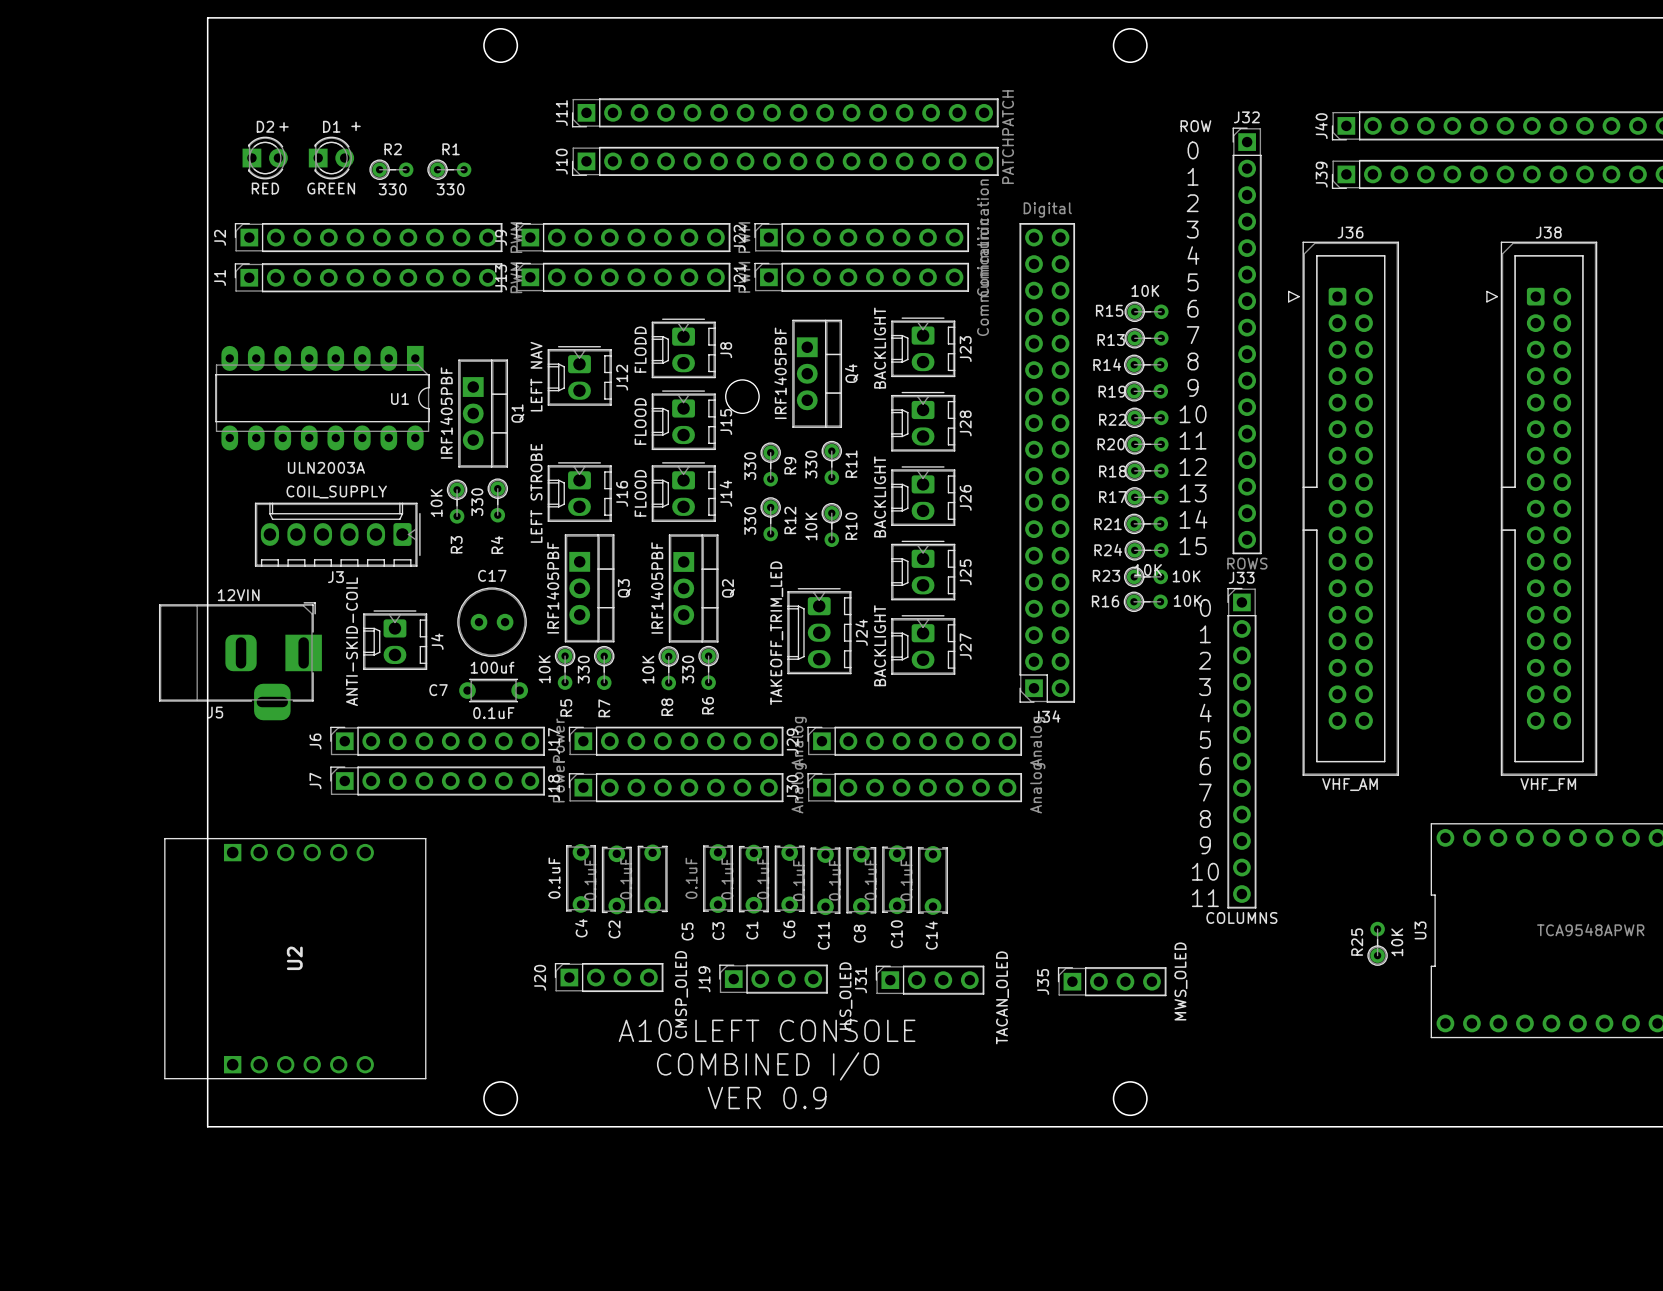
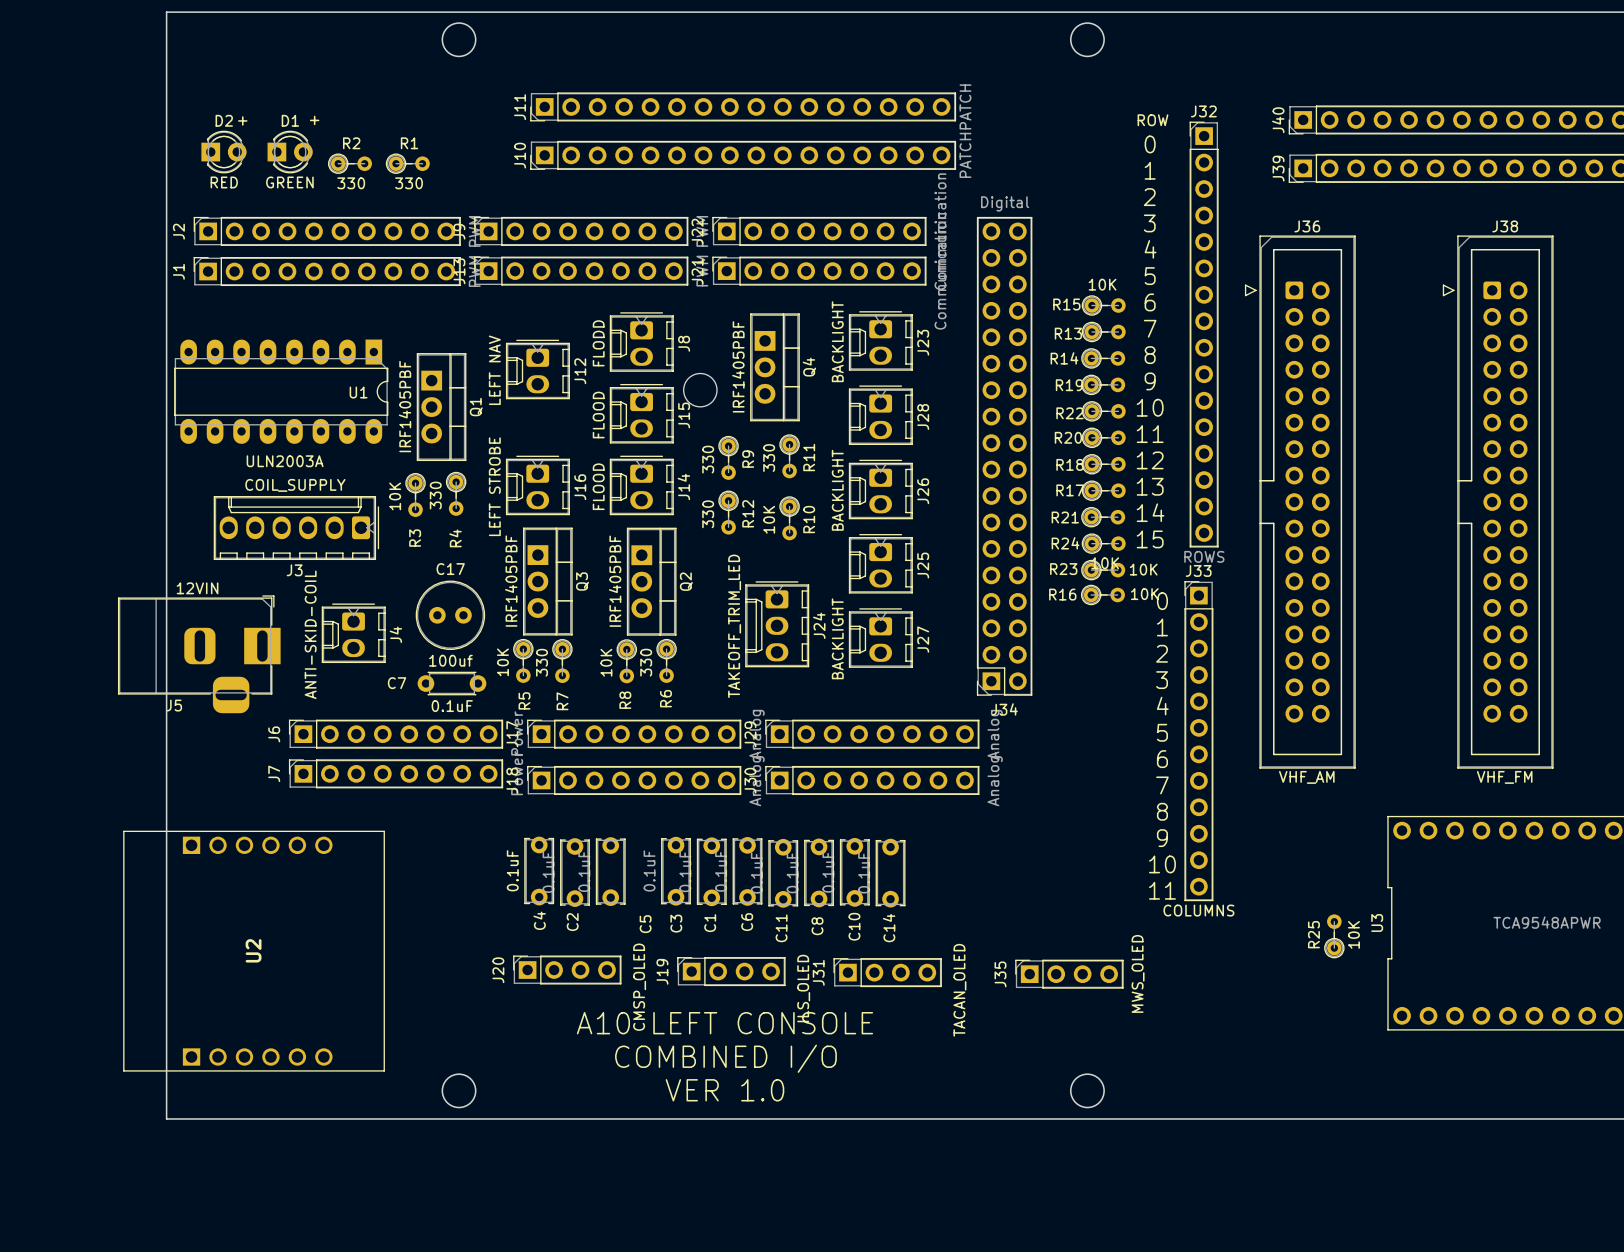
text: VER 0.9 (767, 1098) -> VER 1.0 (724, 1090)

